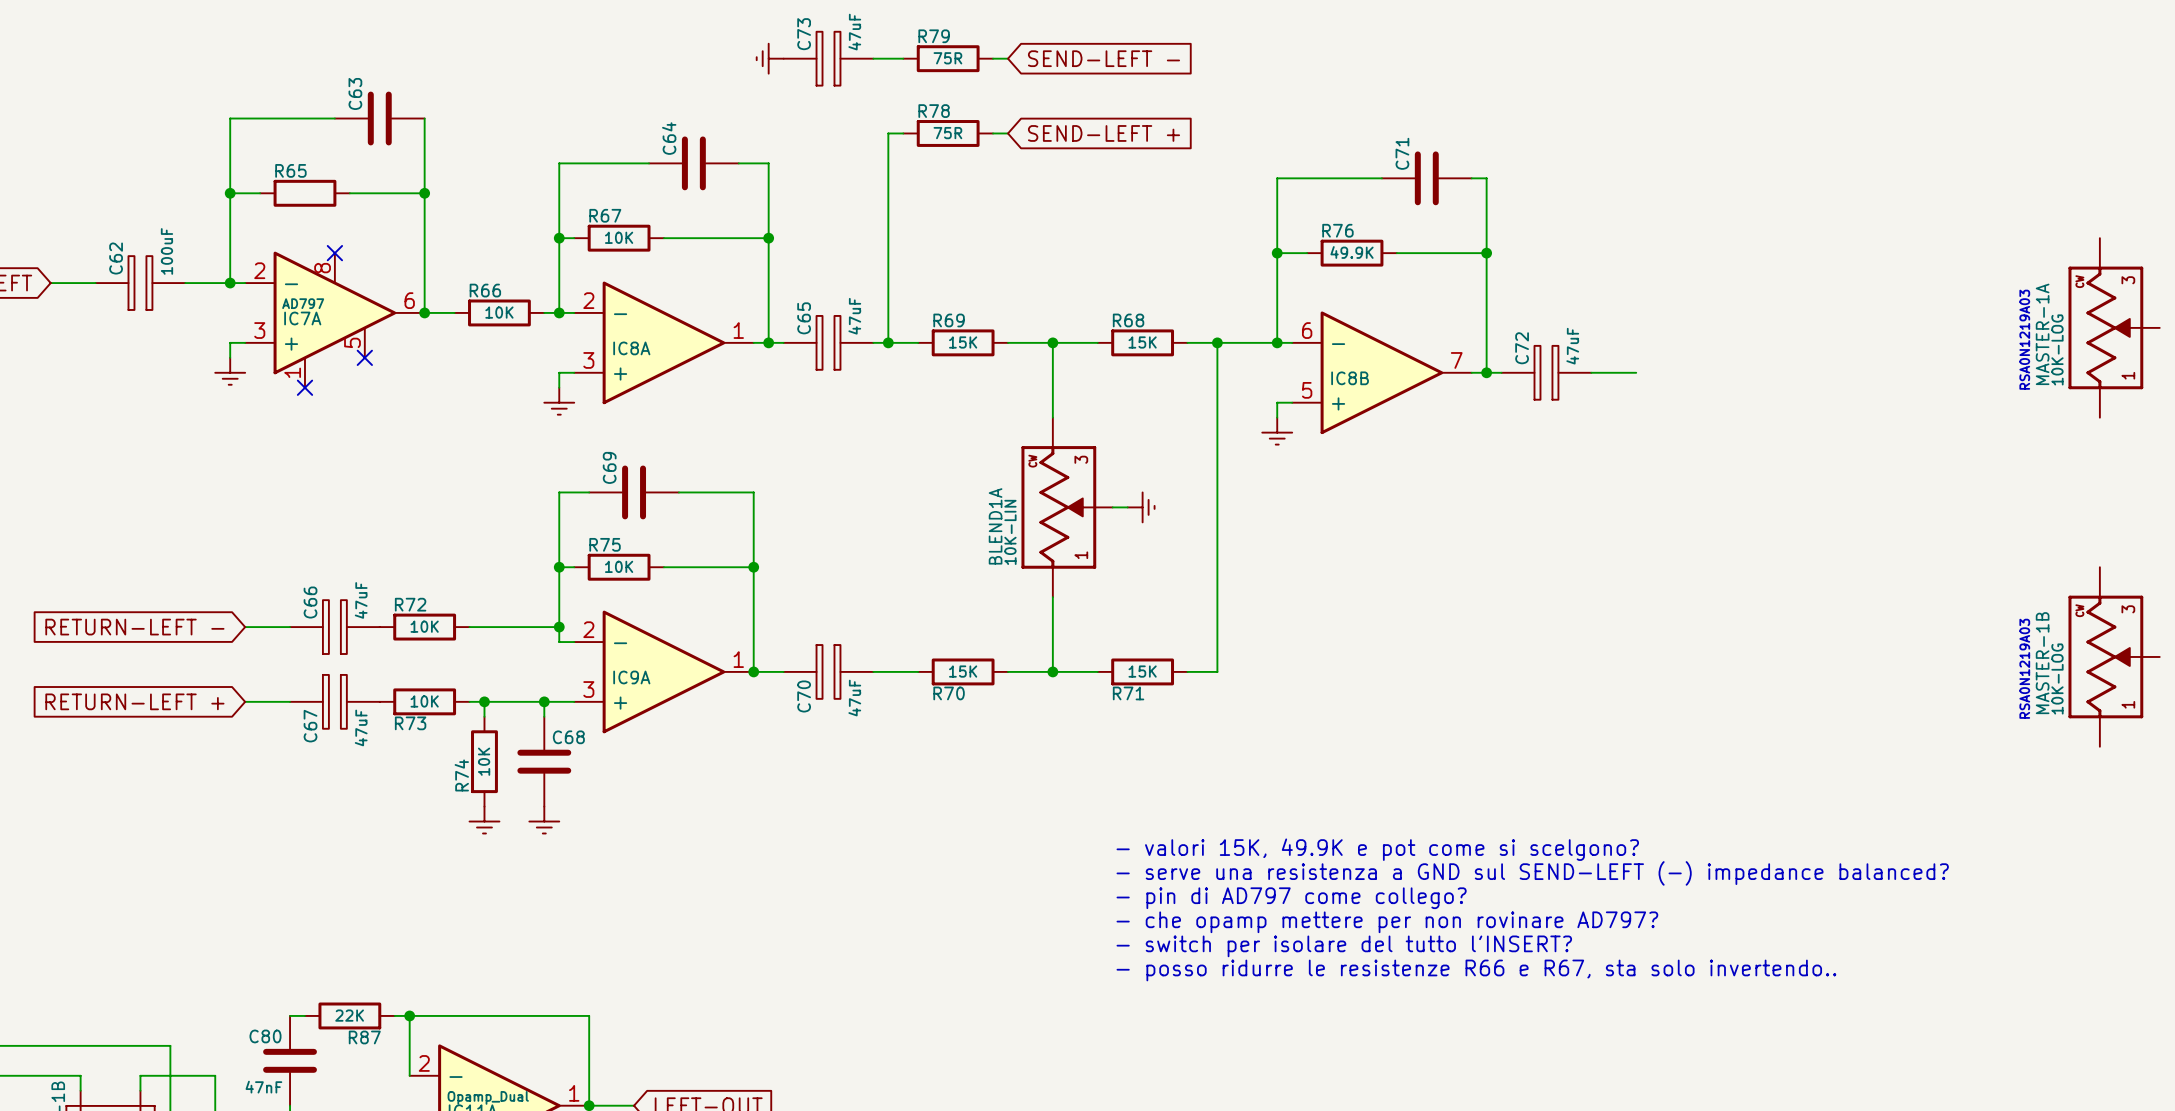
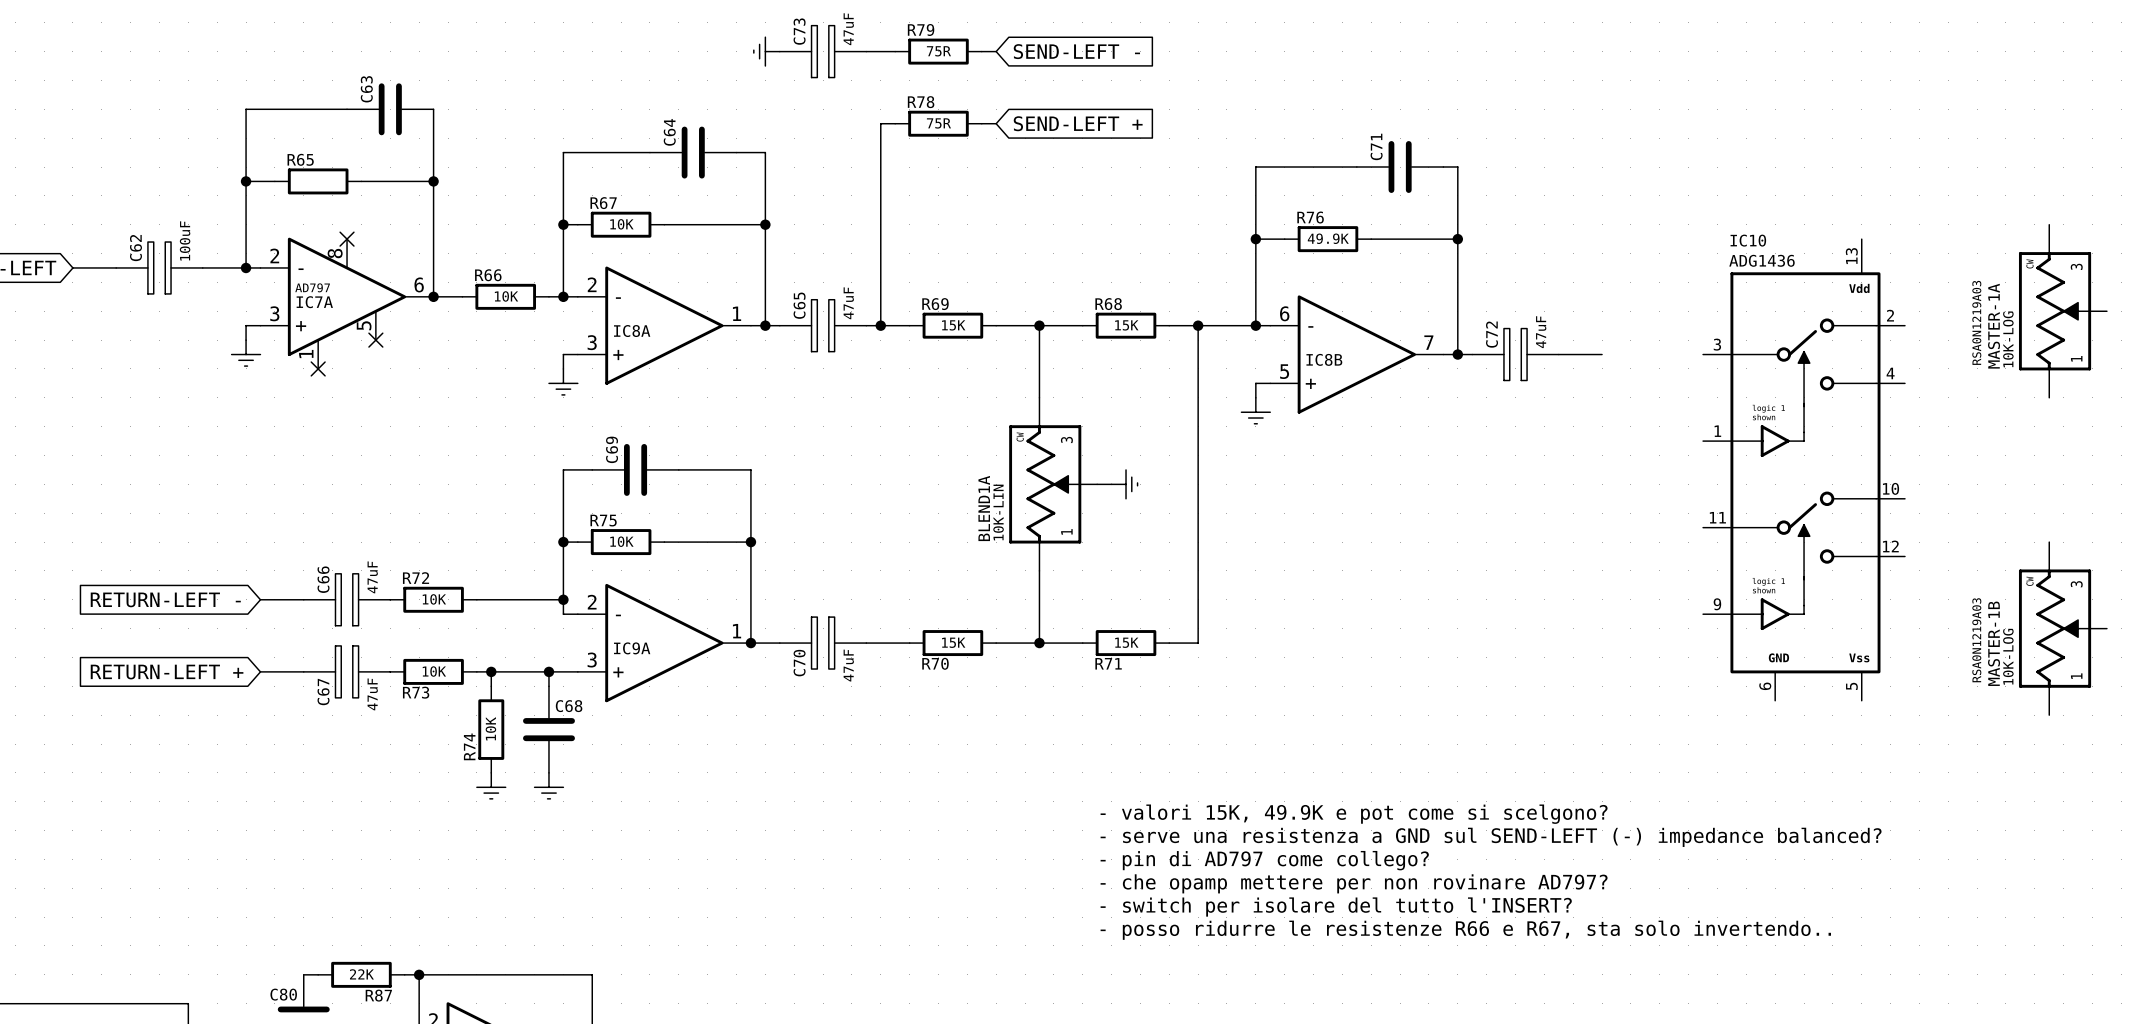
IC10: none -> (1804, 469)

